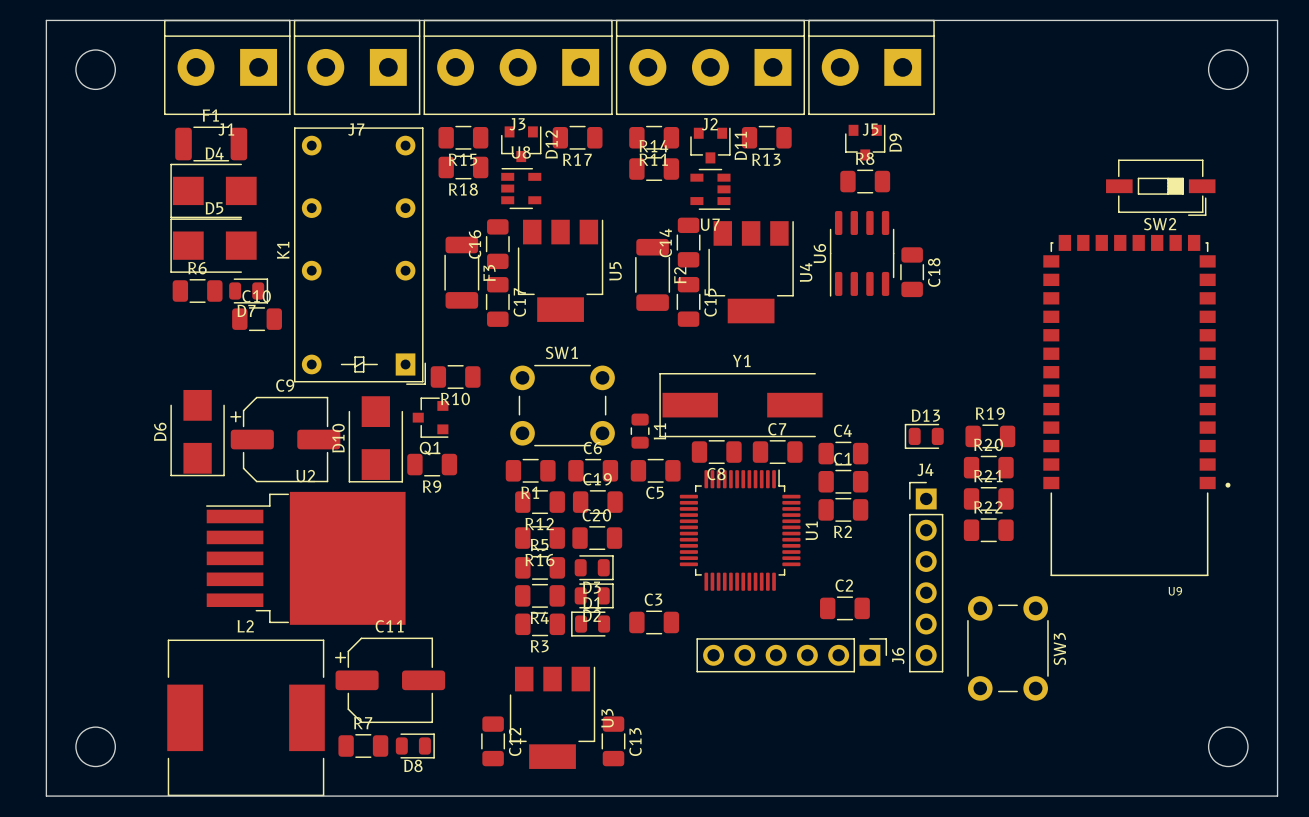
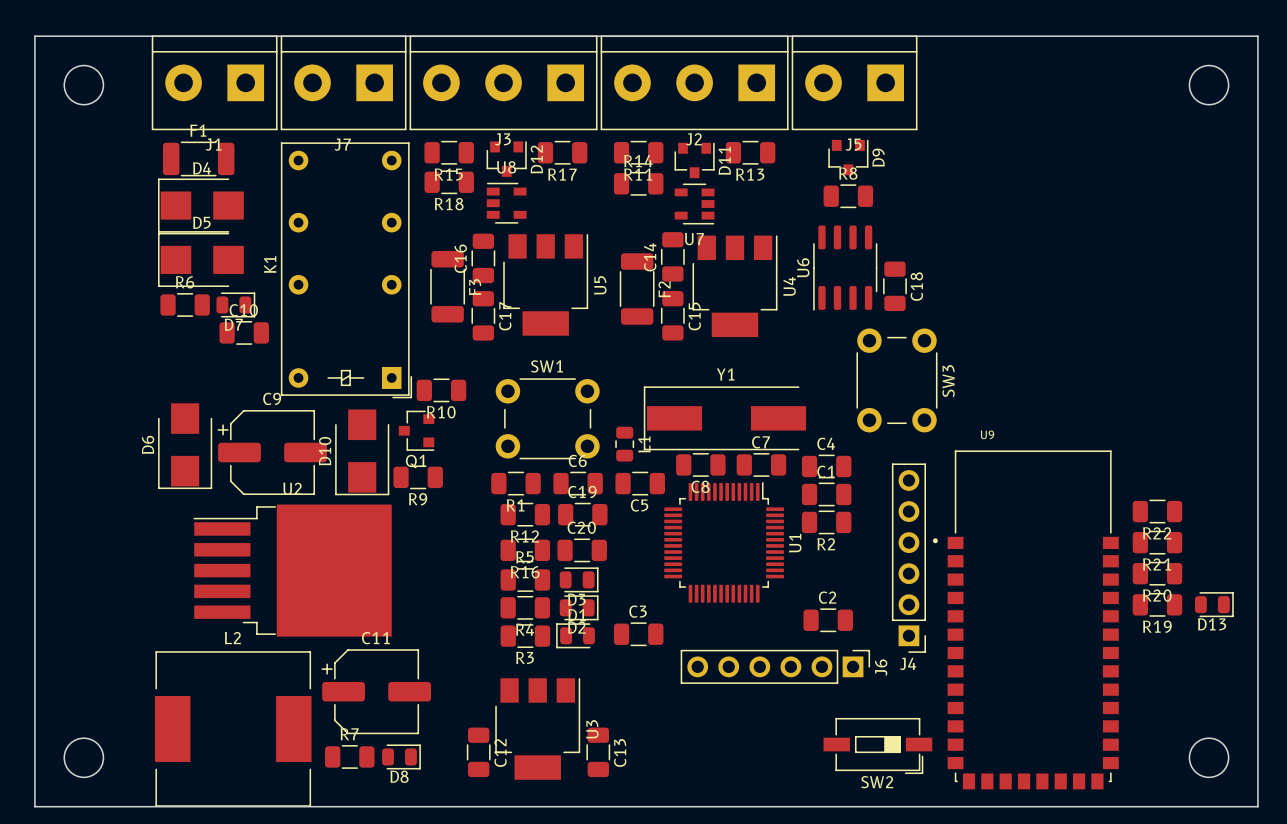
SW2 position: (1160, 187) -> (877, 746)
U9 rotation: 0° (1136, 405) -> 180° (1025, 619)
U9 position: (1136, 405) -> (1025, 619)
R19 name position: R19 (990, 413) -> R19 (1157, 626)
D13 rotation: 0° (924, 436) -> 180° (1214, 604)
D13 position: (924, 436) -> (1214, 604)
R19 position: (990, 436) -> (1157, 604)
R20 name position: R20 (988, 444) -> R20 (1157, 595)
R20 position: (988, 467) -> (1157, 573)
R21 name position: R21 (988, 476) -> R21 (1157, 564)
R21 position: (988, 498) -> (1157, 542)
R22 name position: R22 (988, 507) -> R22 (1157, 533)
R22 position: (988, 530) -> (1157, 511)
J4 rotation: 0° (926, 577) -> 180° (908, 558)
SW3 position: (1007, 648) -> (896, 380)

